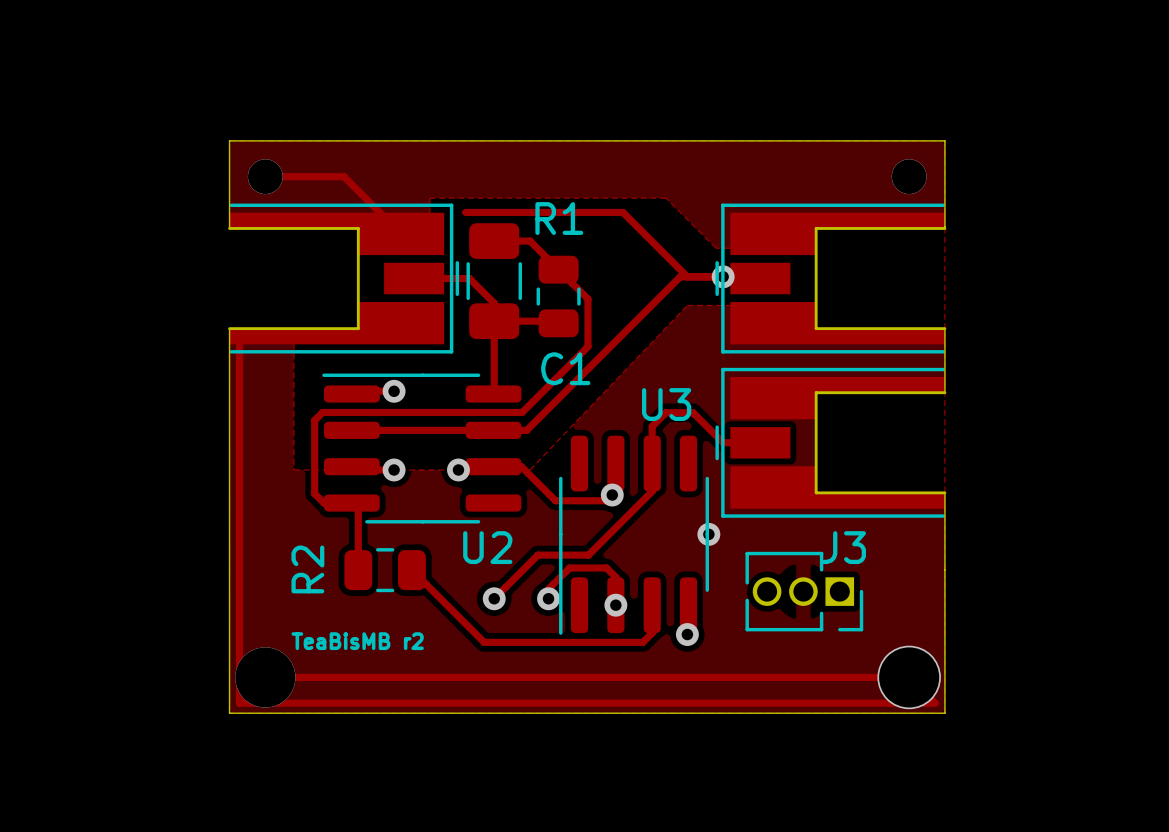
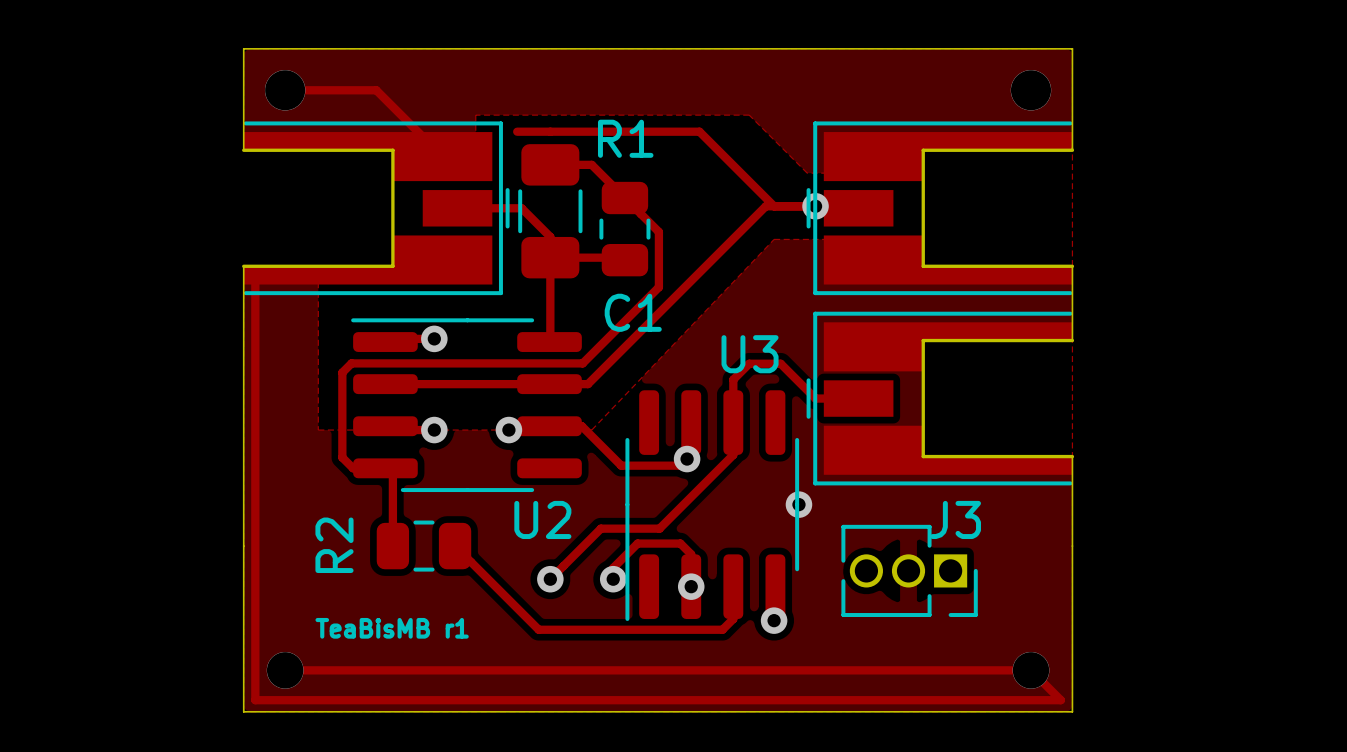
text: TeaBisMB r2 (357, 641) -> TeaBisMB r1 (392, 628)
via size: [877, 645, 941, 710] -> [1012, 651, 1050, 689]
via size: [235, 647, 296, 708] -> [266, 651, 304, 689]

